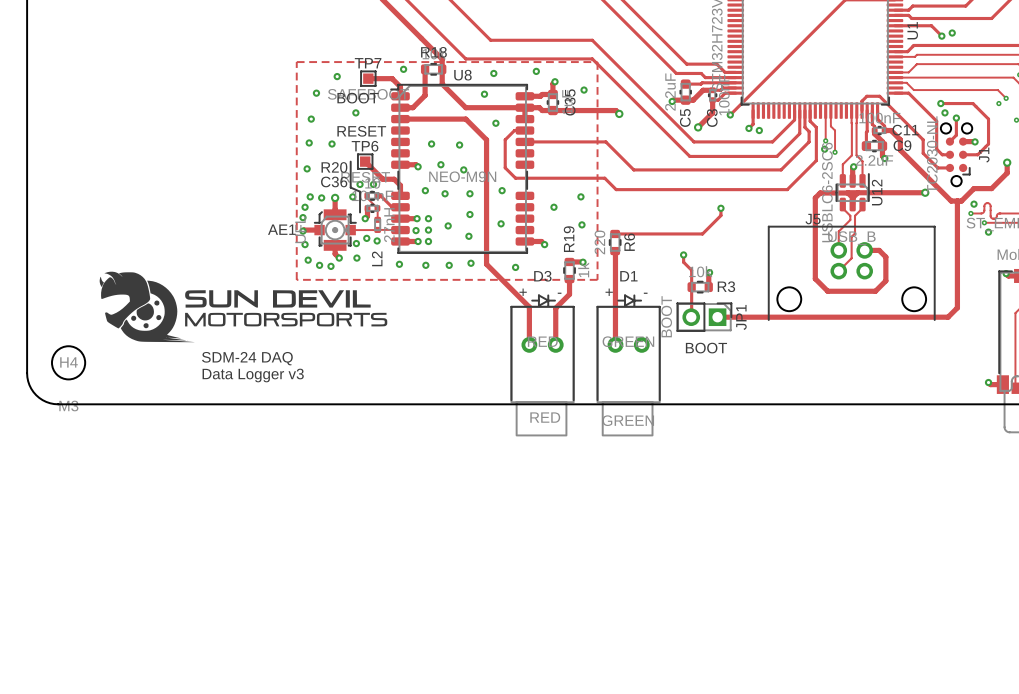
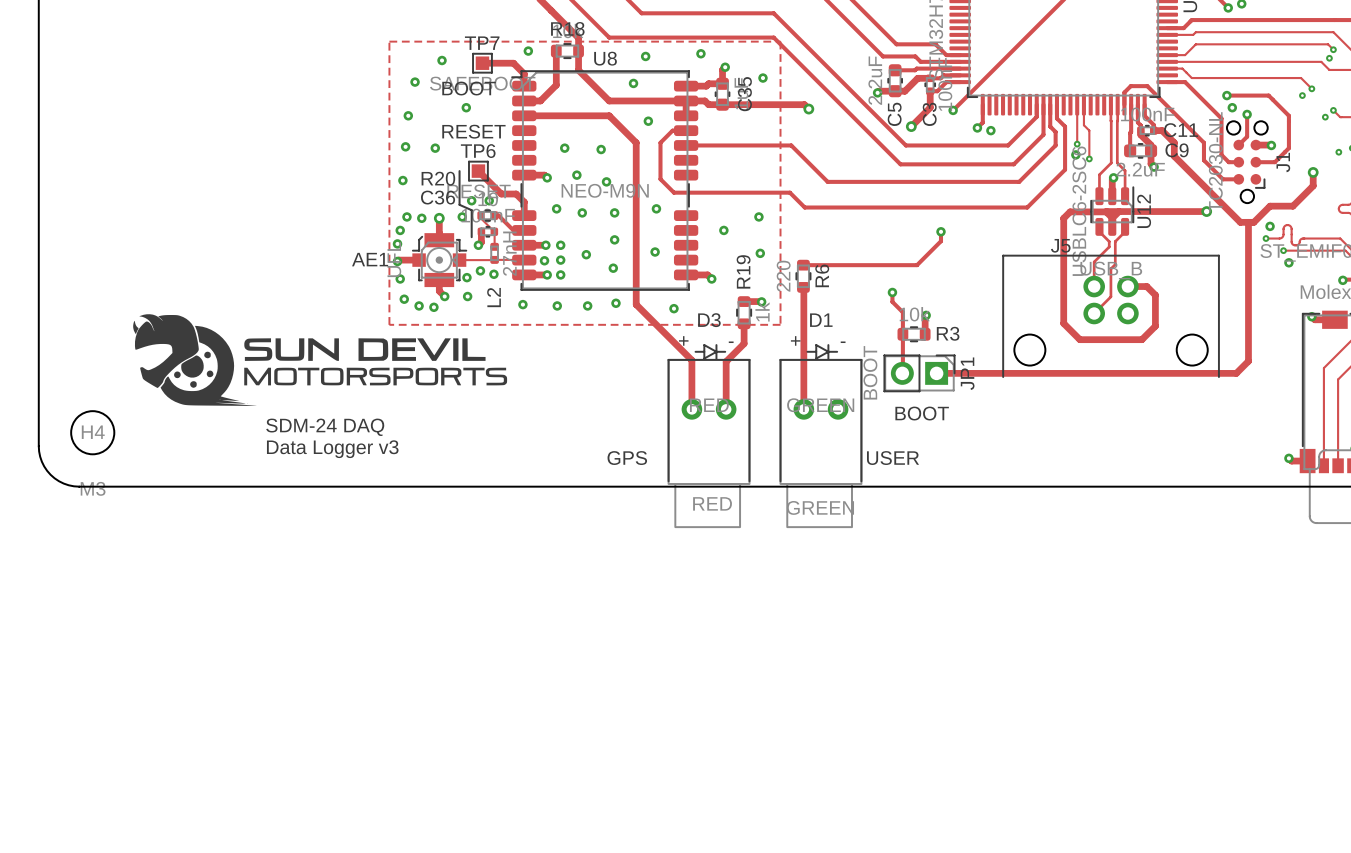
text: none -> GPS (627, 458)
text: none -> USER (893, 458)

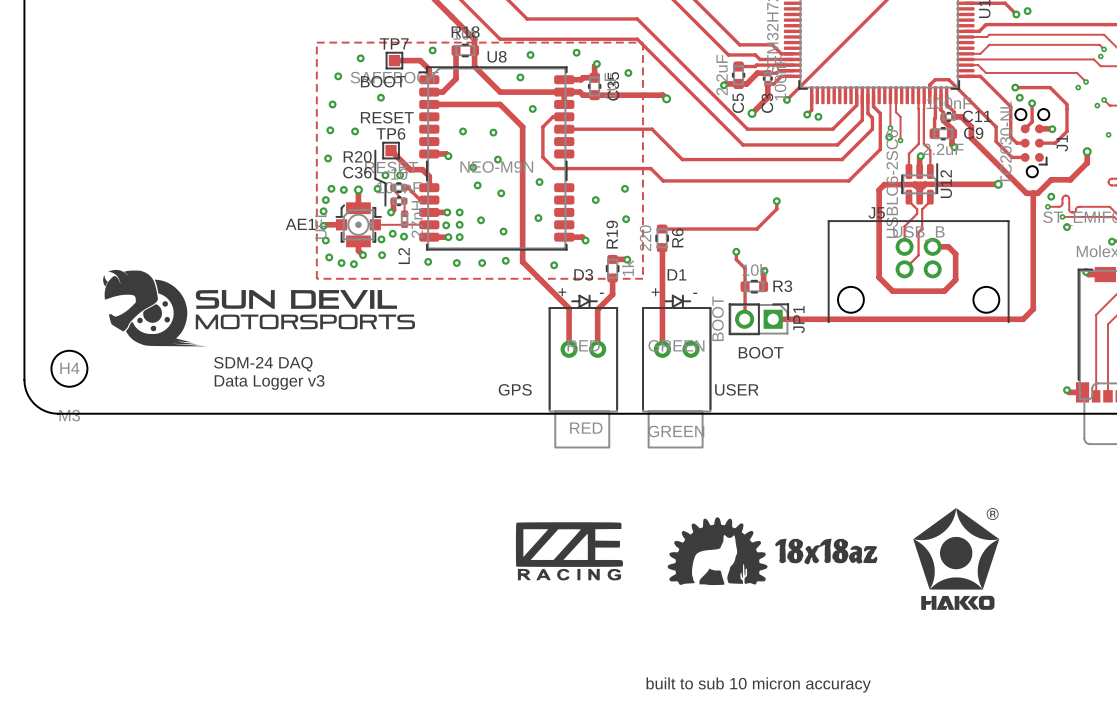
via: (576, 175) -> none
via: none -> (473, 167)
via: (556, 208) -> none
via: (614, 212) -> none
via: none -> (501, 193)
via: (614, 239) -> none
drawing: none -> [913, 508, 1000, 610]
drawing: none -> [667, 517, 878, 586]
drawing: none -> [515, 522, 624, 581]
text: none -> built to sub 10 micron accuracy (758, 685)

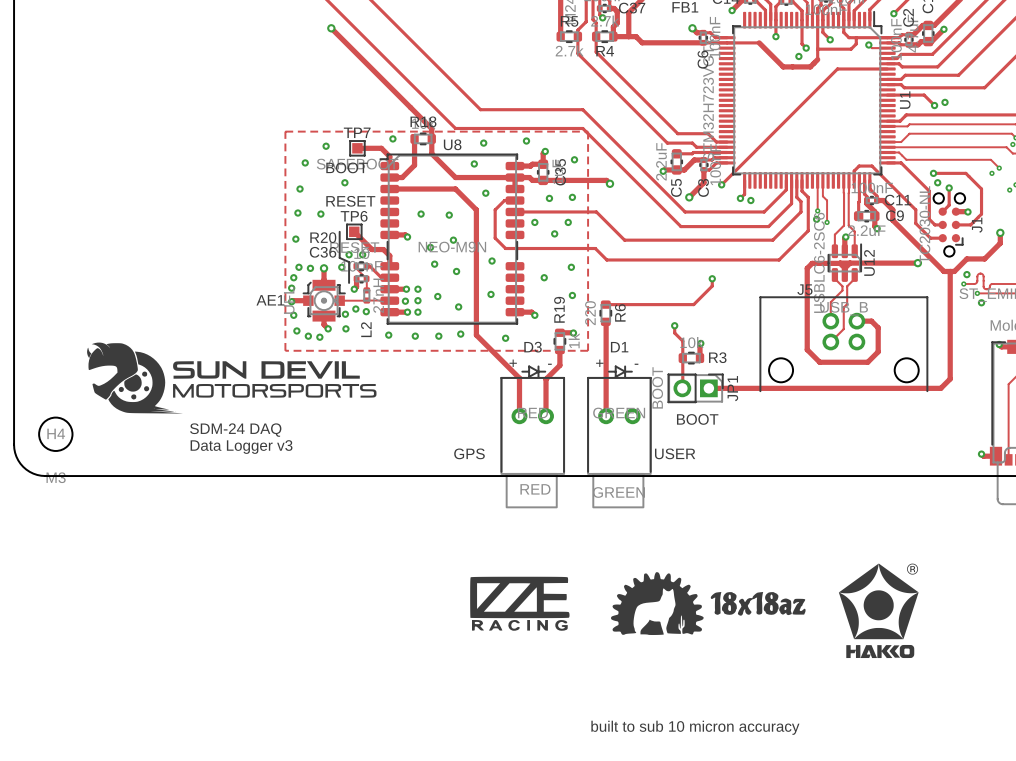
via: none -> (572, 197)
via: none -> (549, 198)
via: none -> (534, 222)
via: none -> (568, 222)
via: none -> (554, 233)

